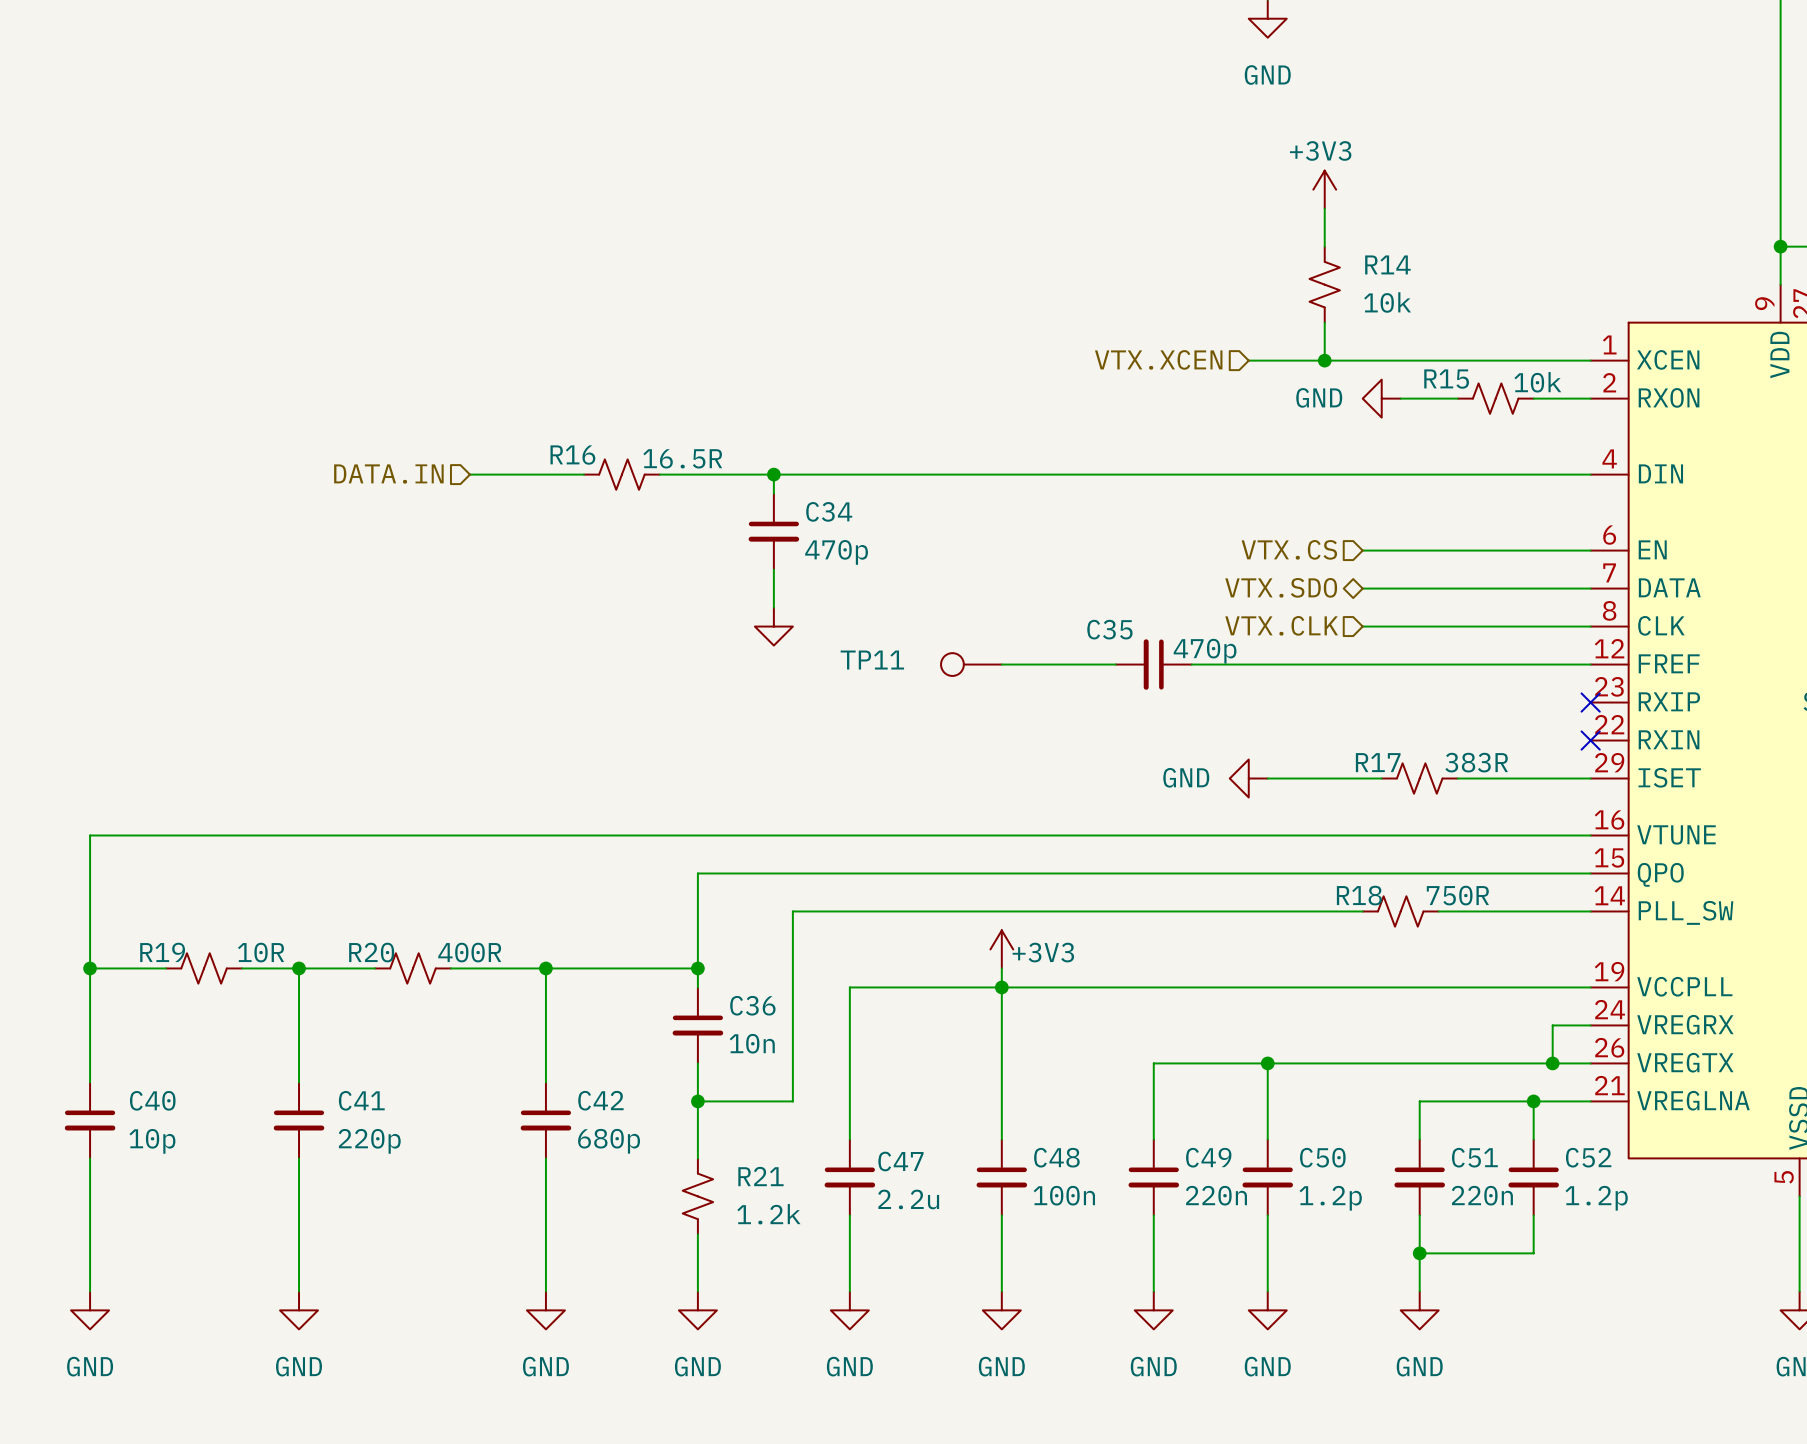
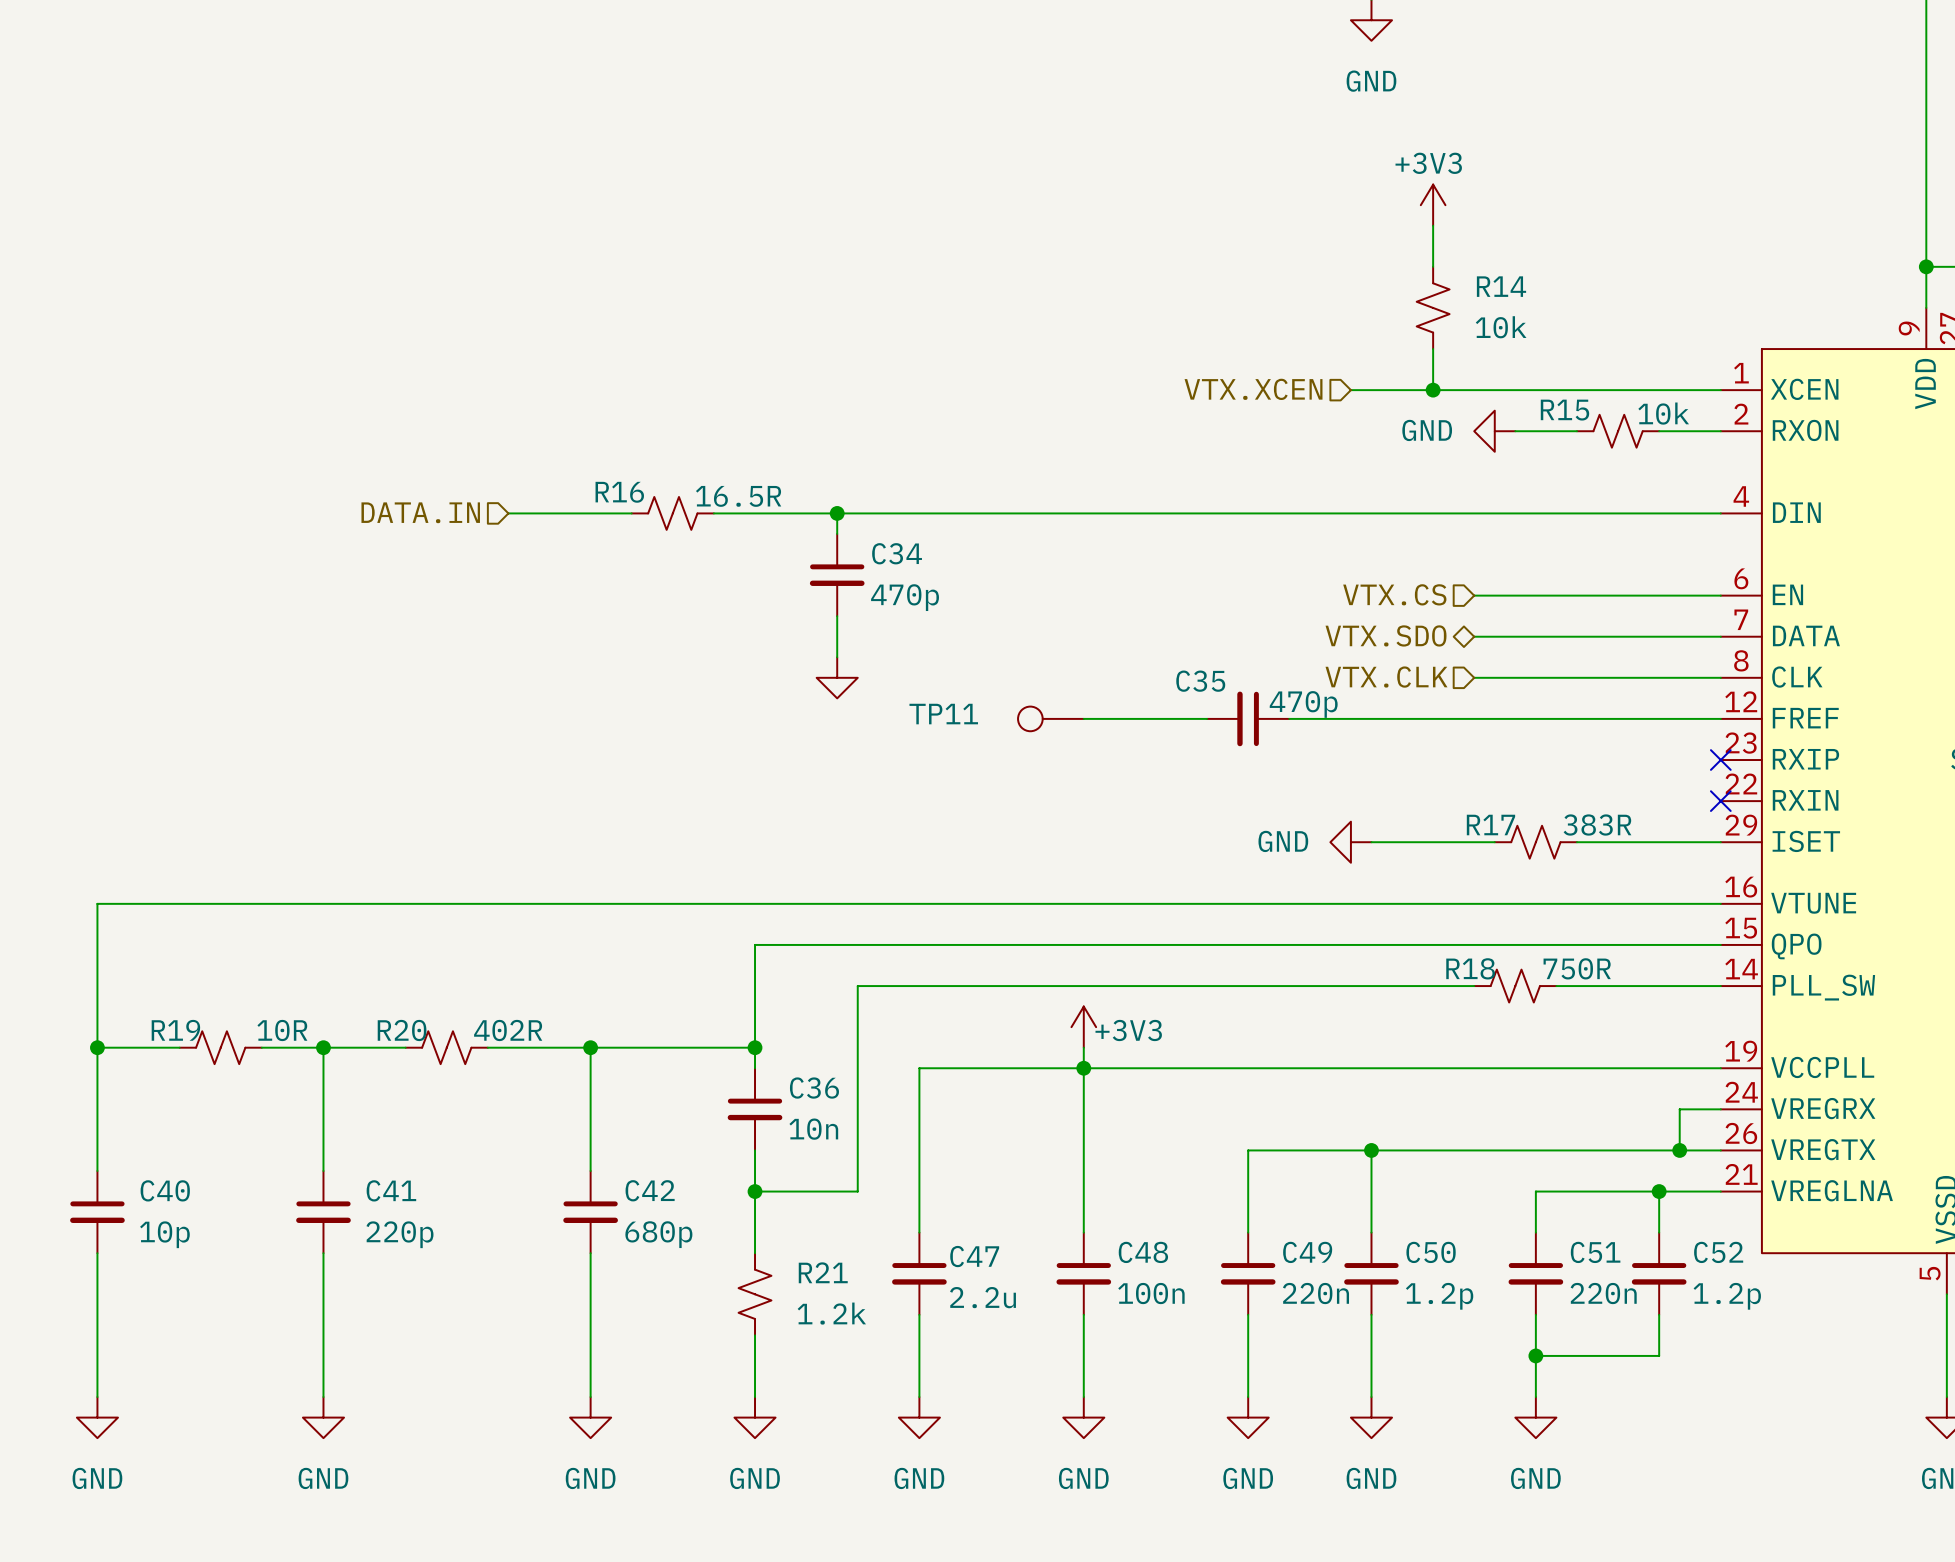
R20 value: 400R (469, 952) -> 402R (508, 1030)

